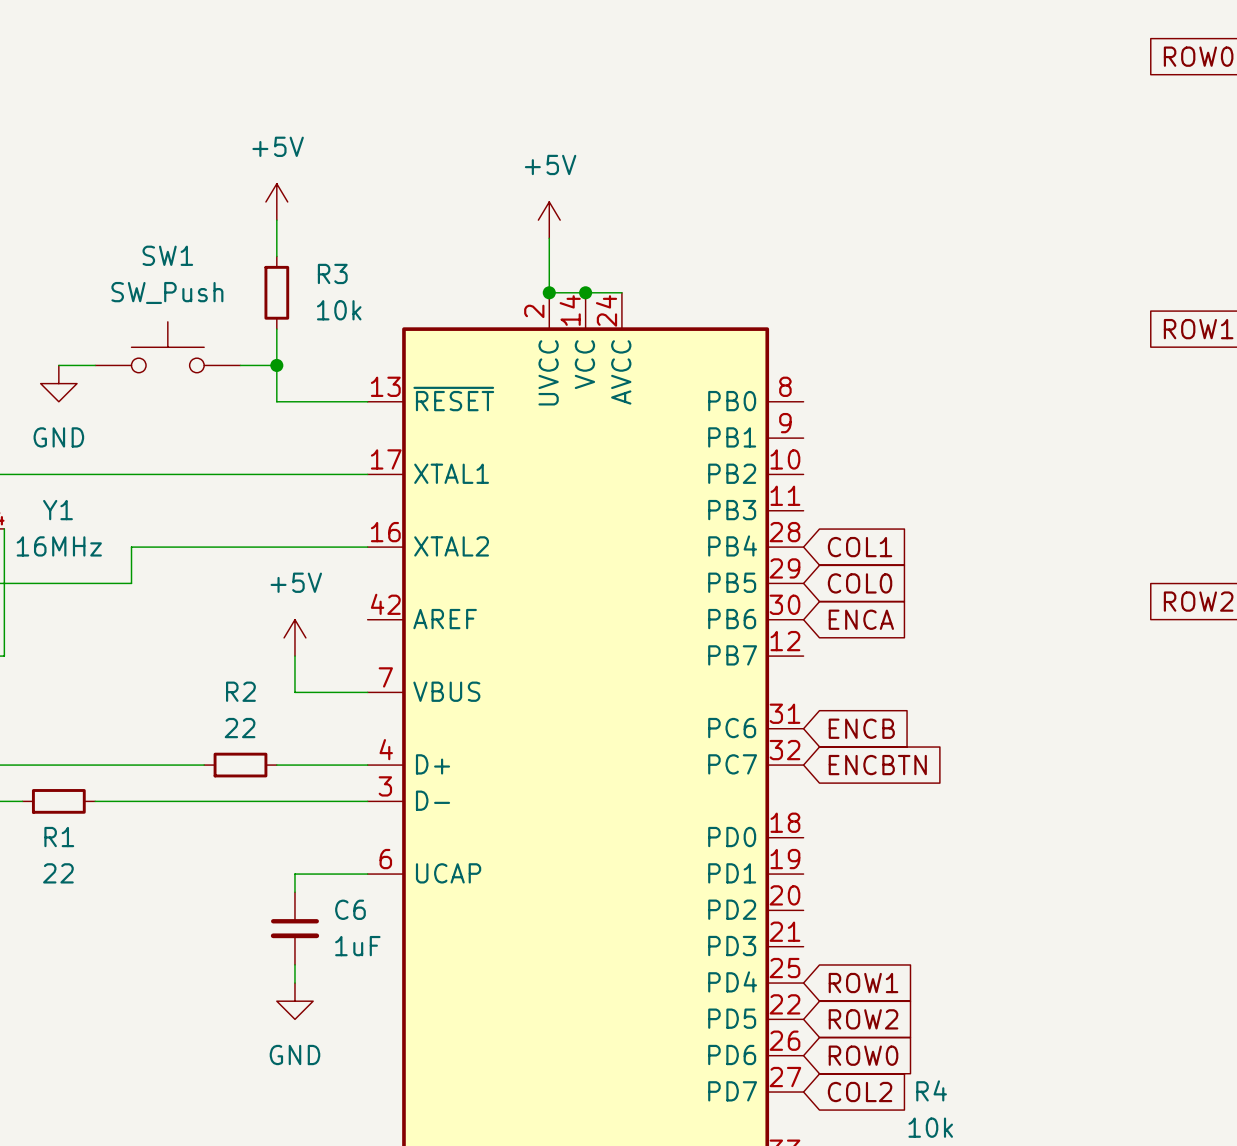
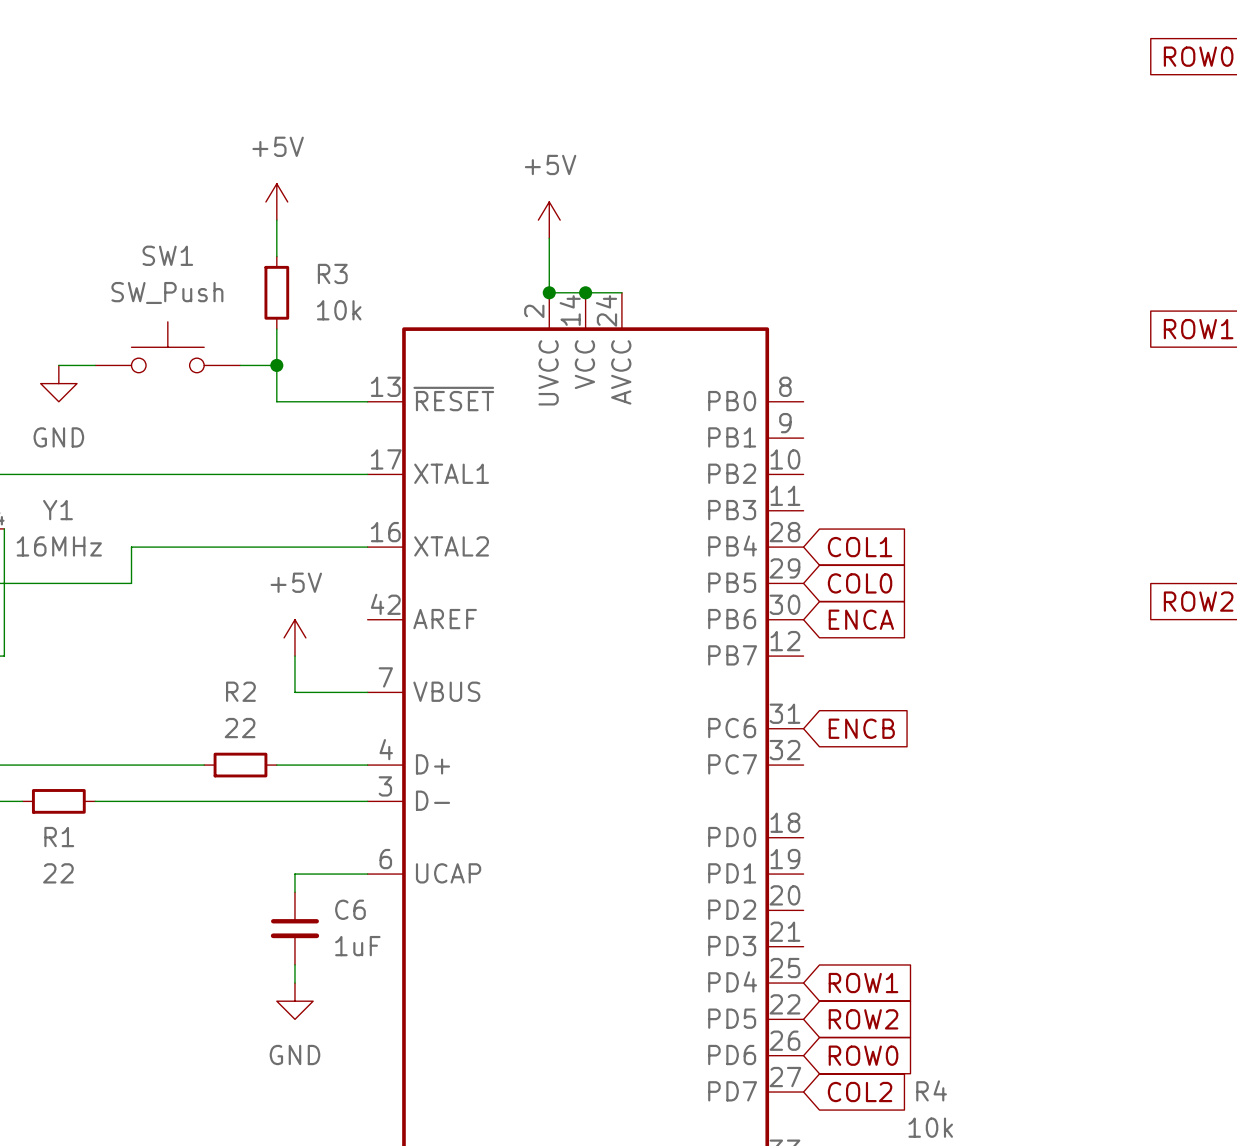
global label: ENCBTN (877, 765) -> none

